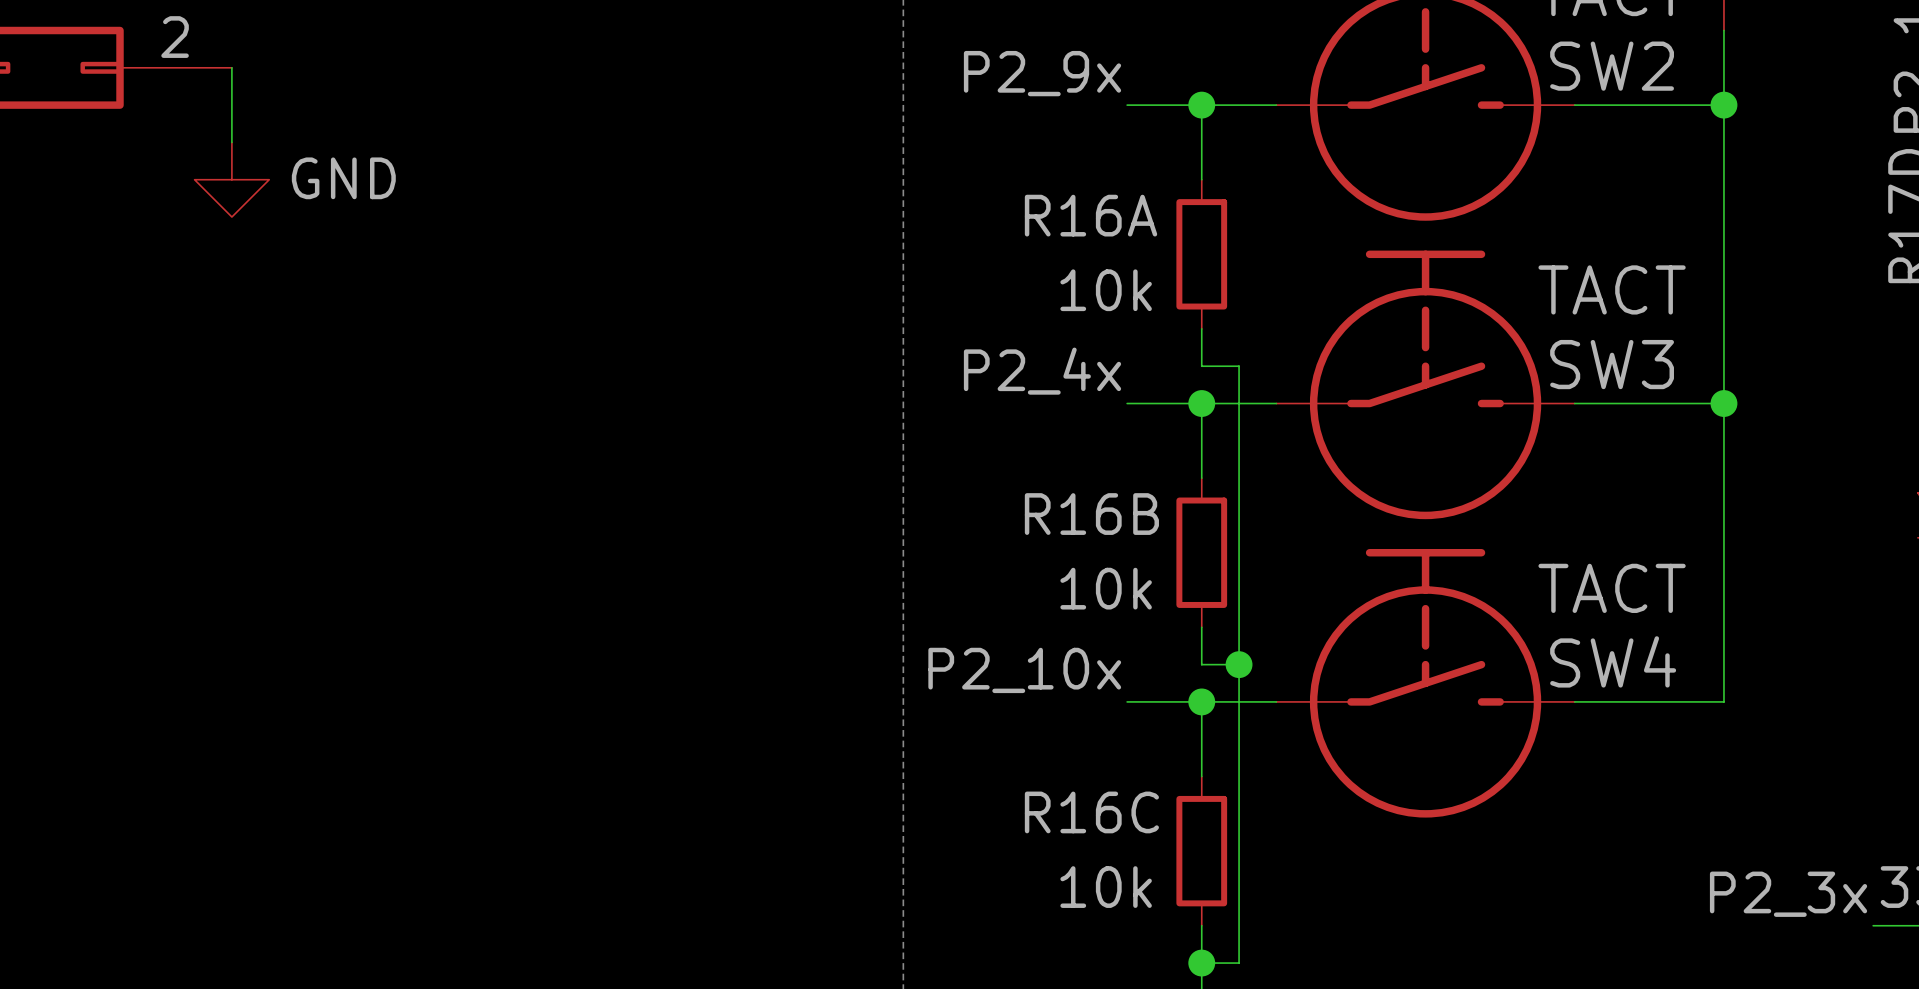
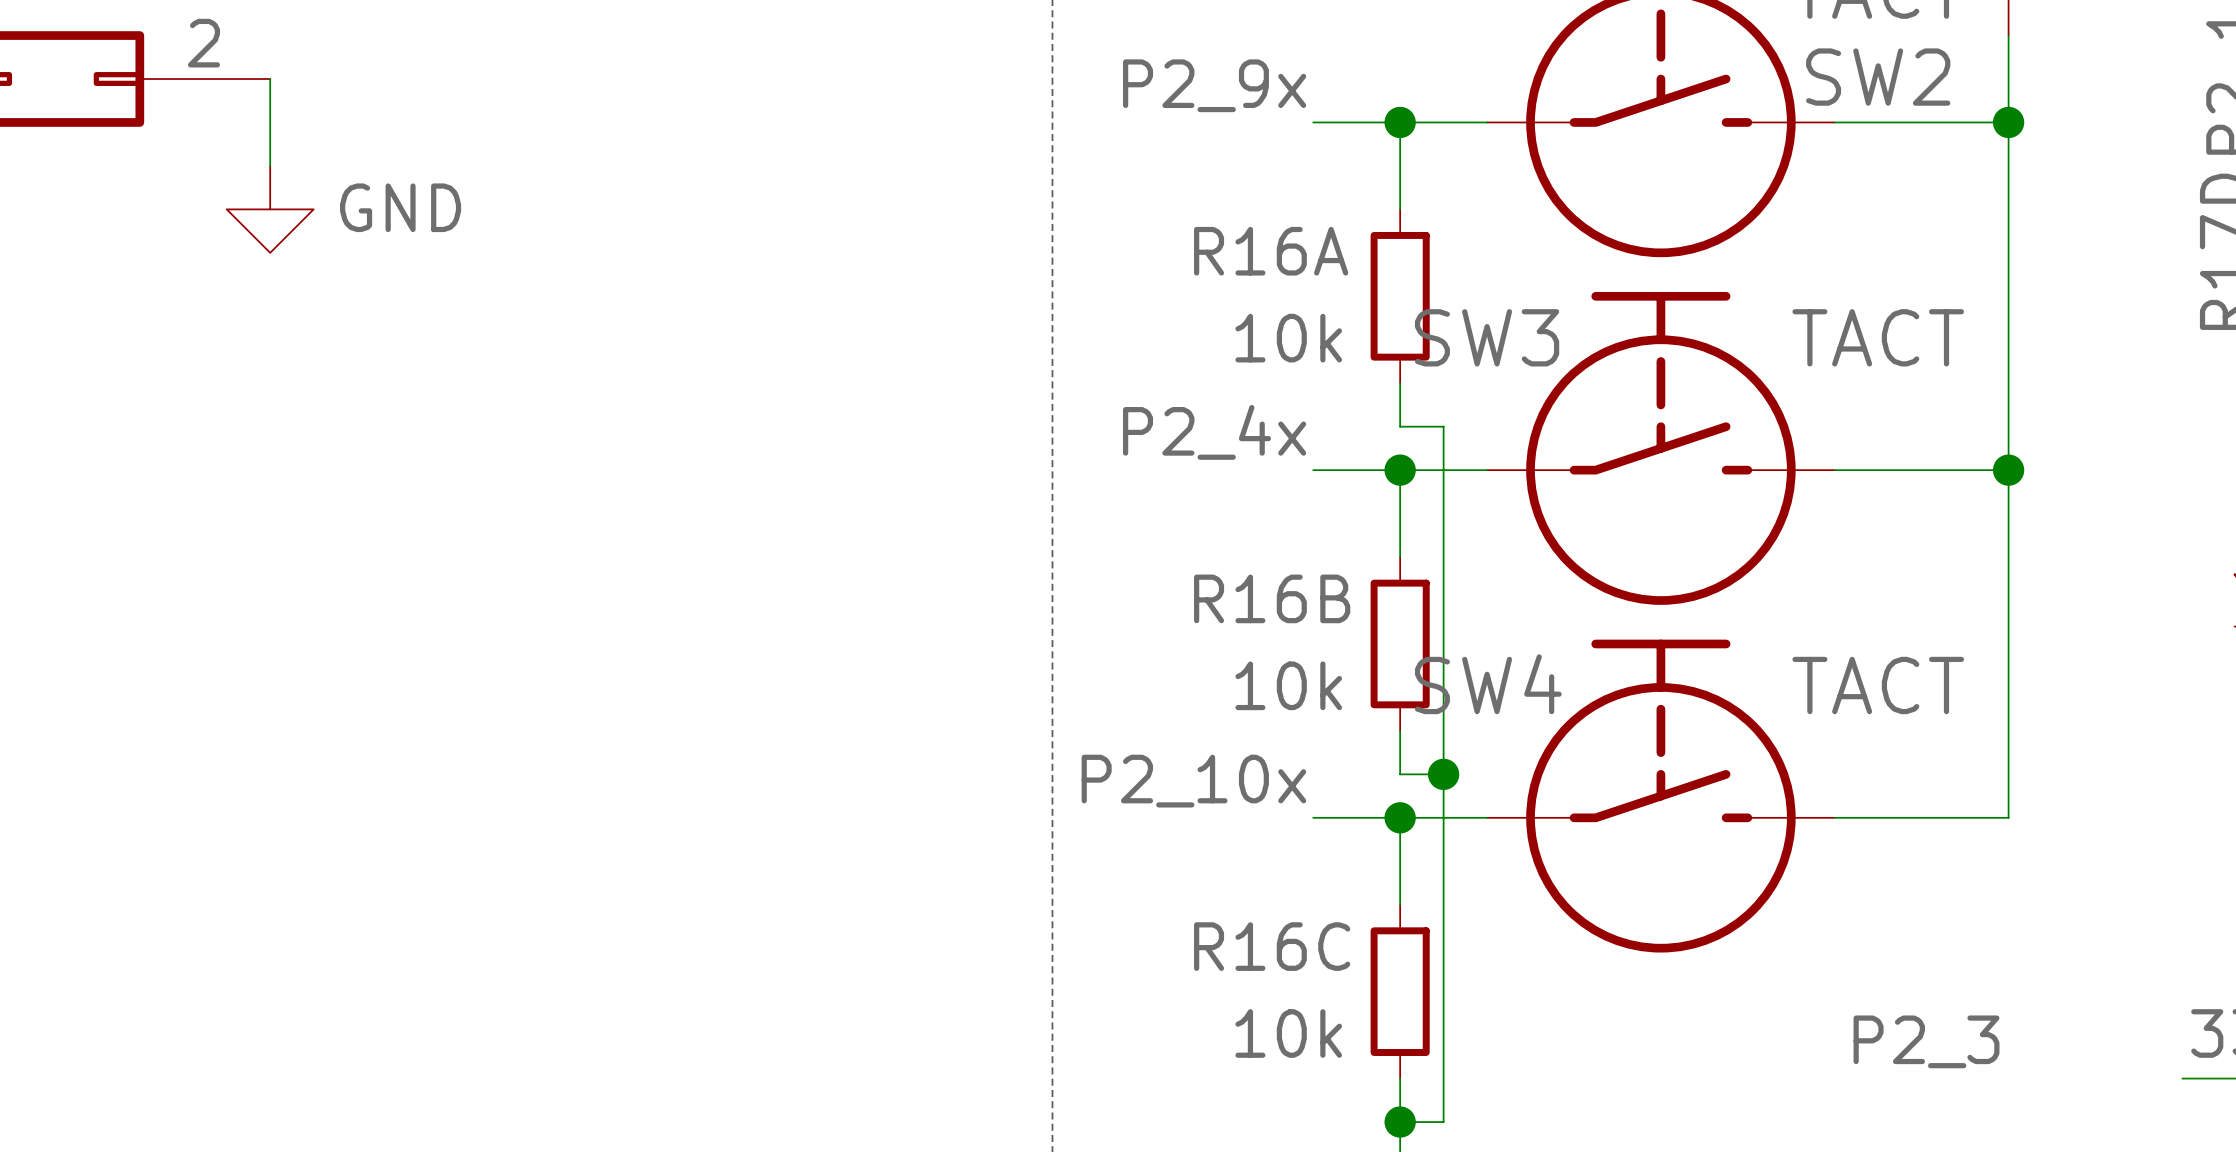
SW3 name position: SW3 (1612, 364) -> SW3 (1487, 337)
SW4 name position: SW4 (1613, 661) -> SW4 (1488, 684)
label: P2_3x (1788, 894) -> P2_3 (1926, 1041)

